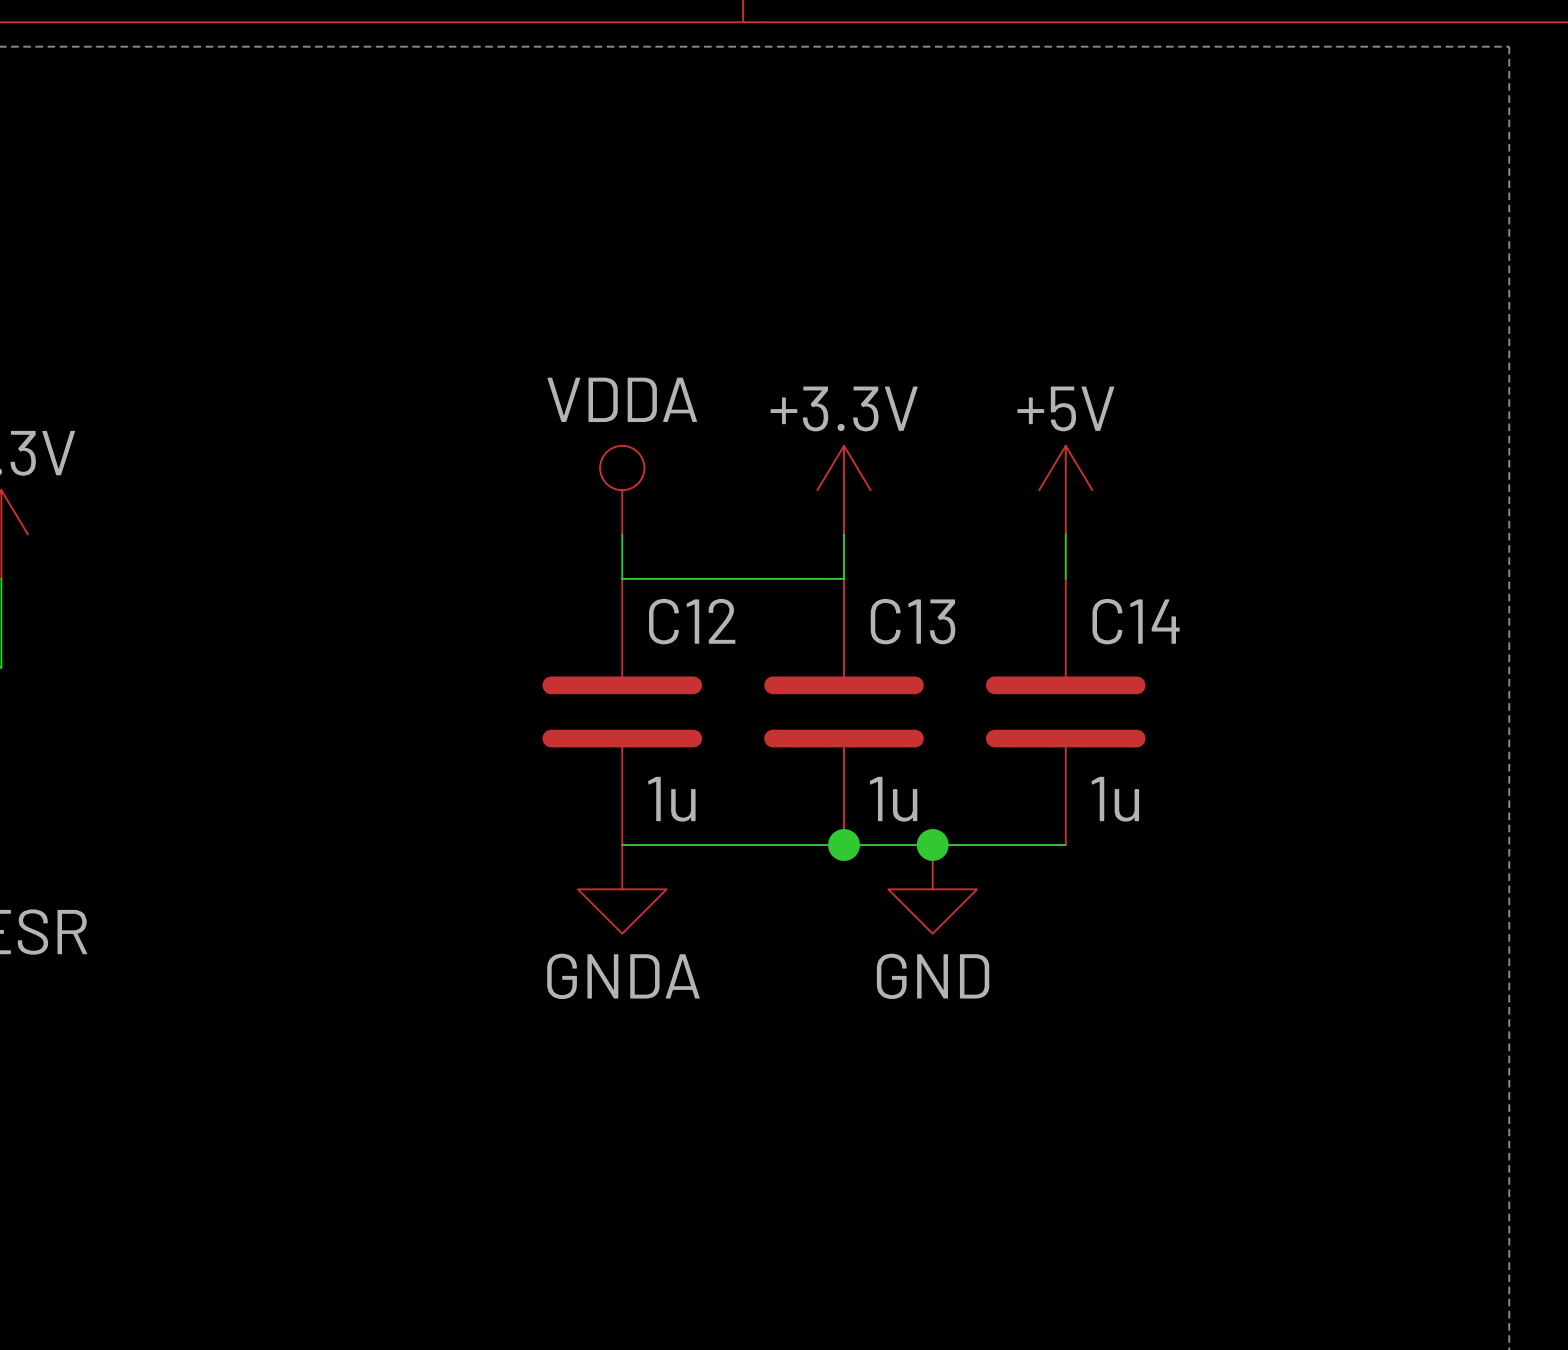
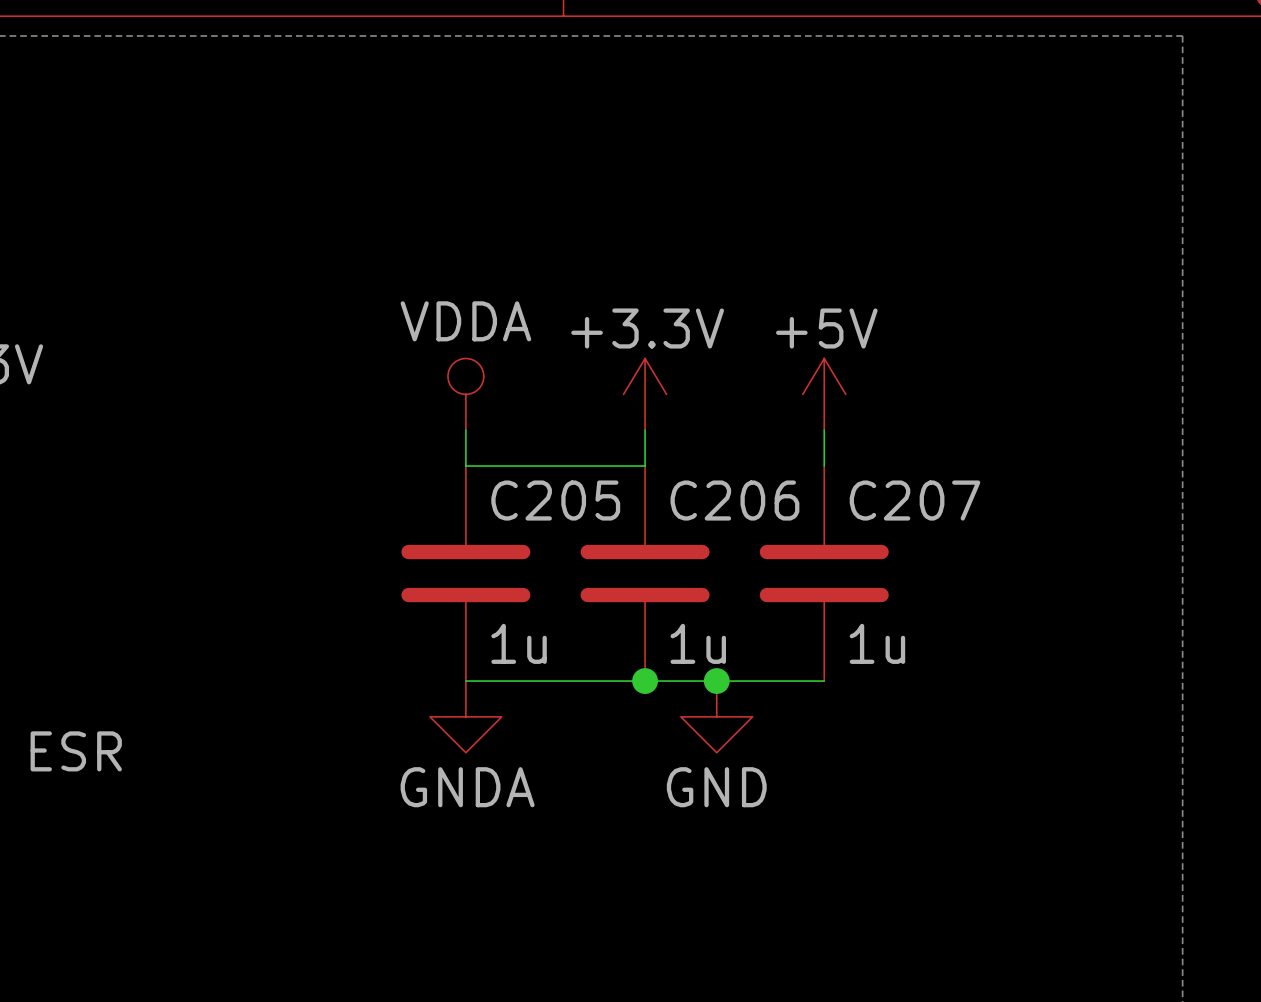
C12 name: C12 (692, 621) -> C205 (555, 500)
C13 name: C13 (913, 621) -> C206 (734, 500)
C14 name: C14 (1136, 621) -> C207 (914, 500)

